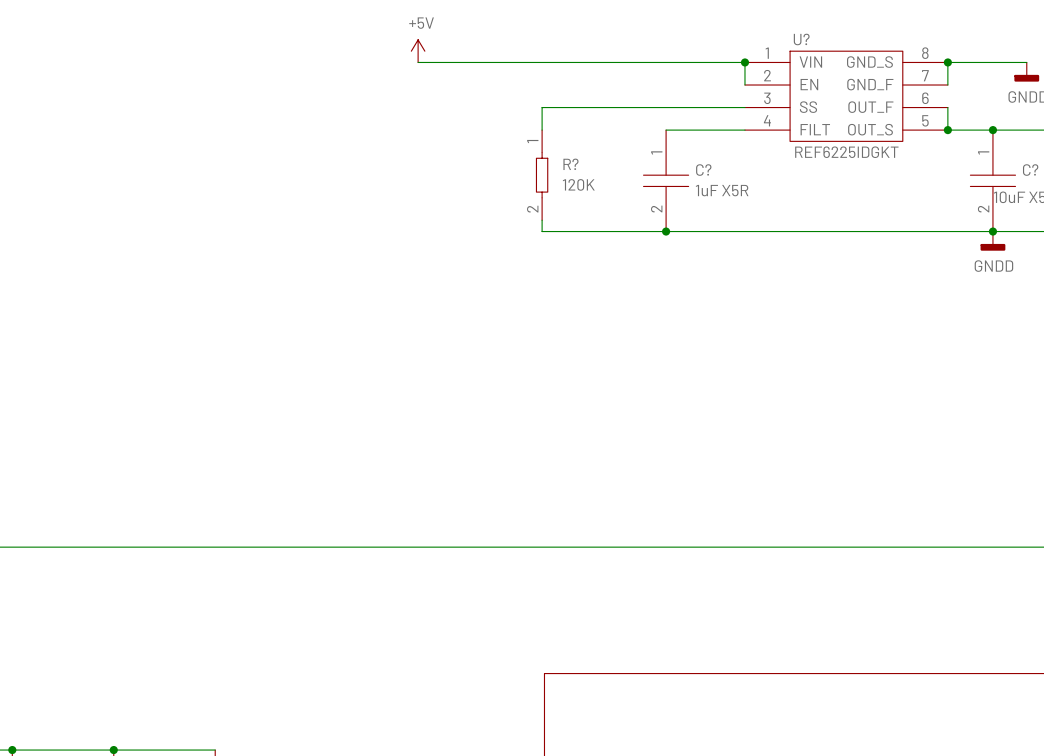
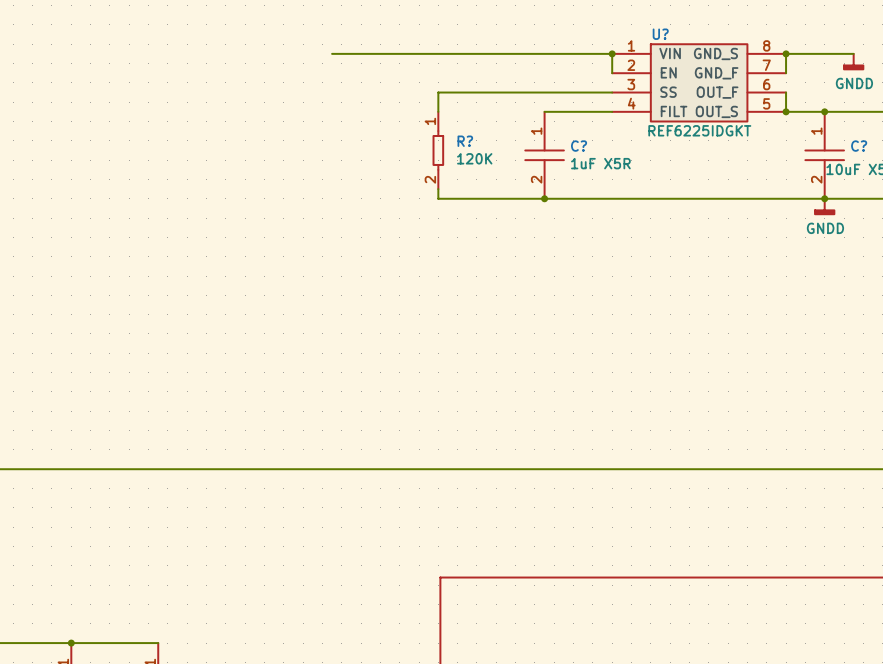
power symbol: +5V (418, 51) -> none

